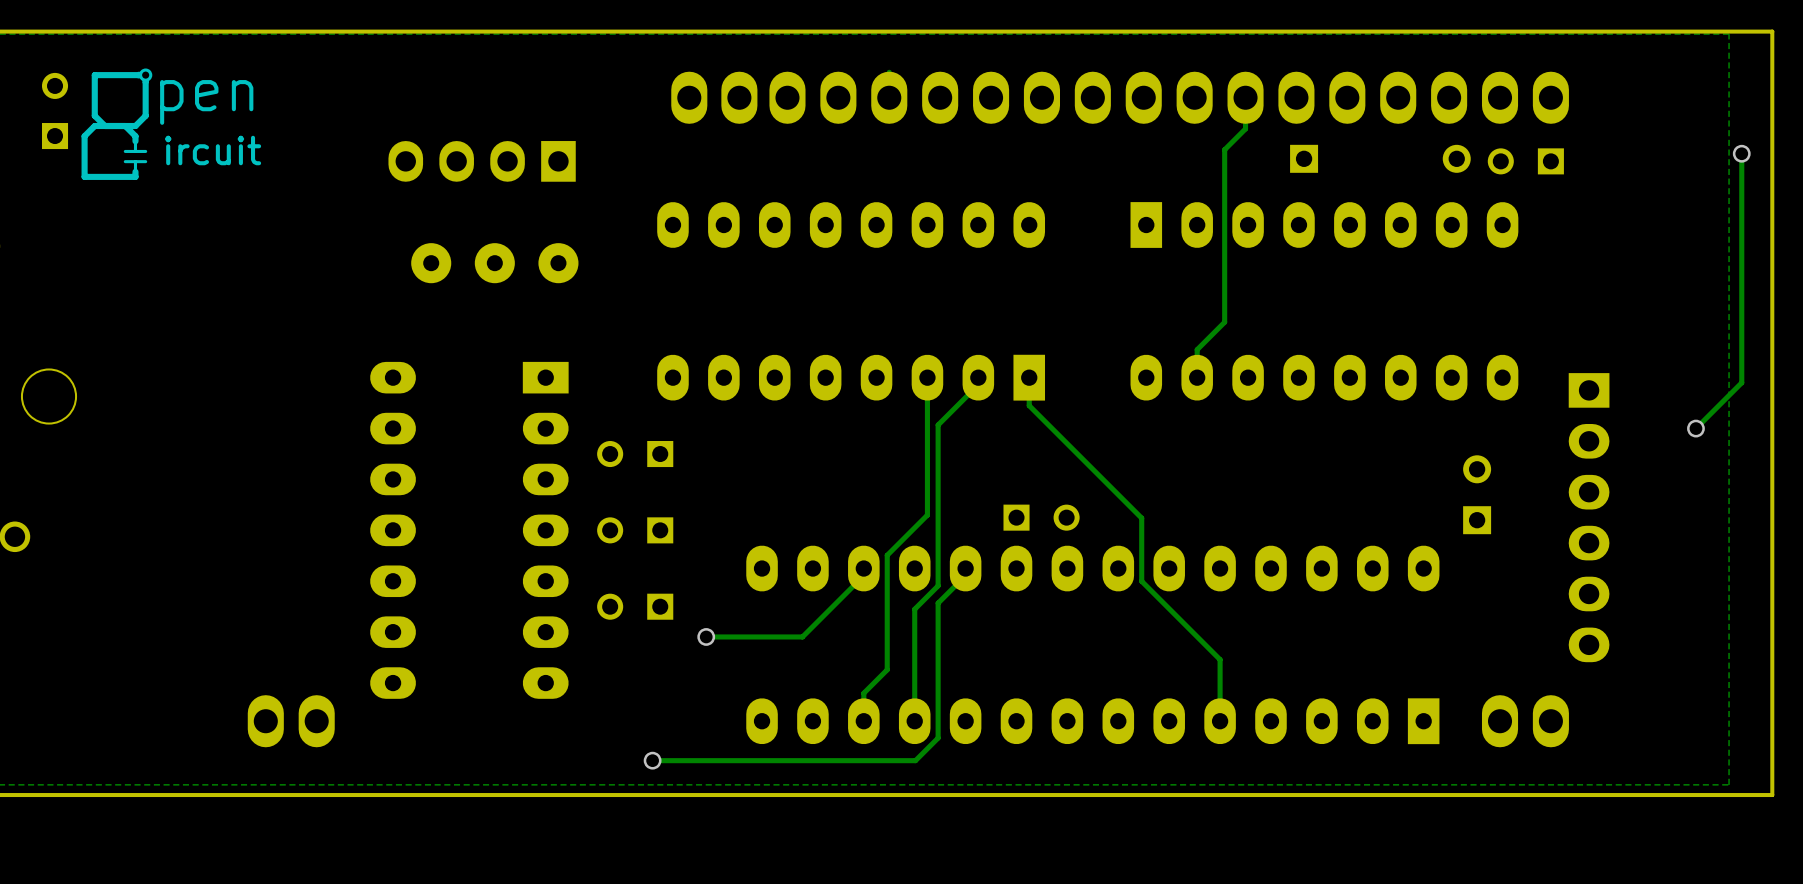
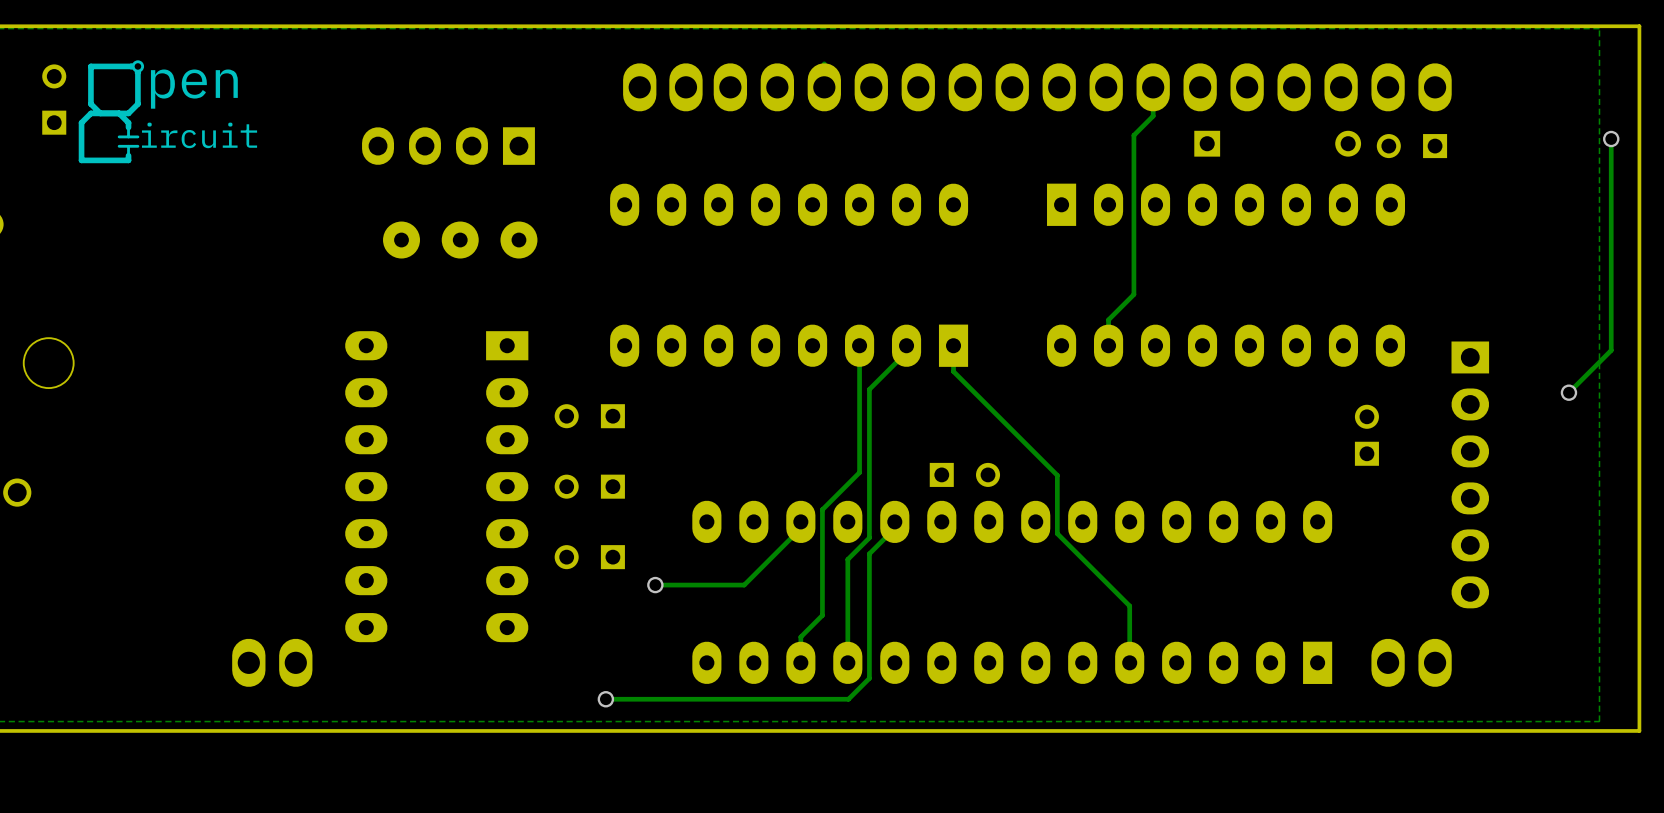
part footprint: [1463, 455, 1492, 535] -> [1354, 404, 1379, 466]

